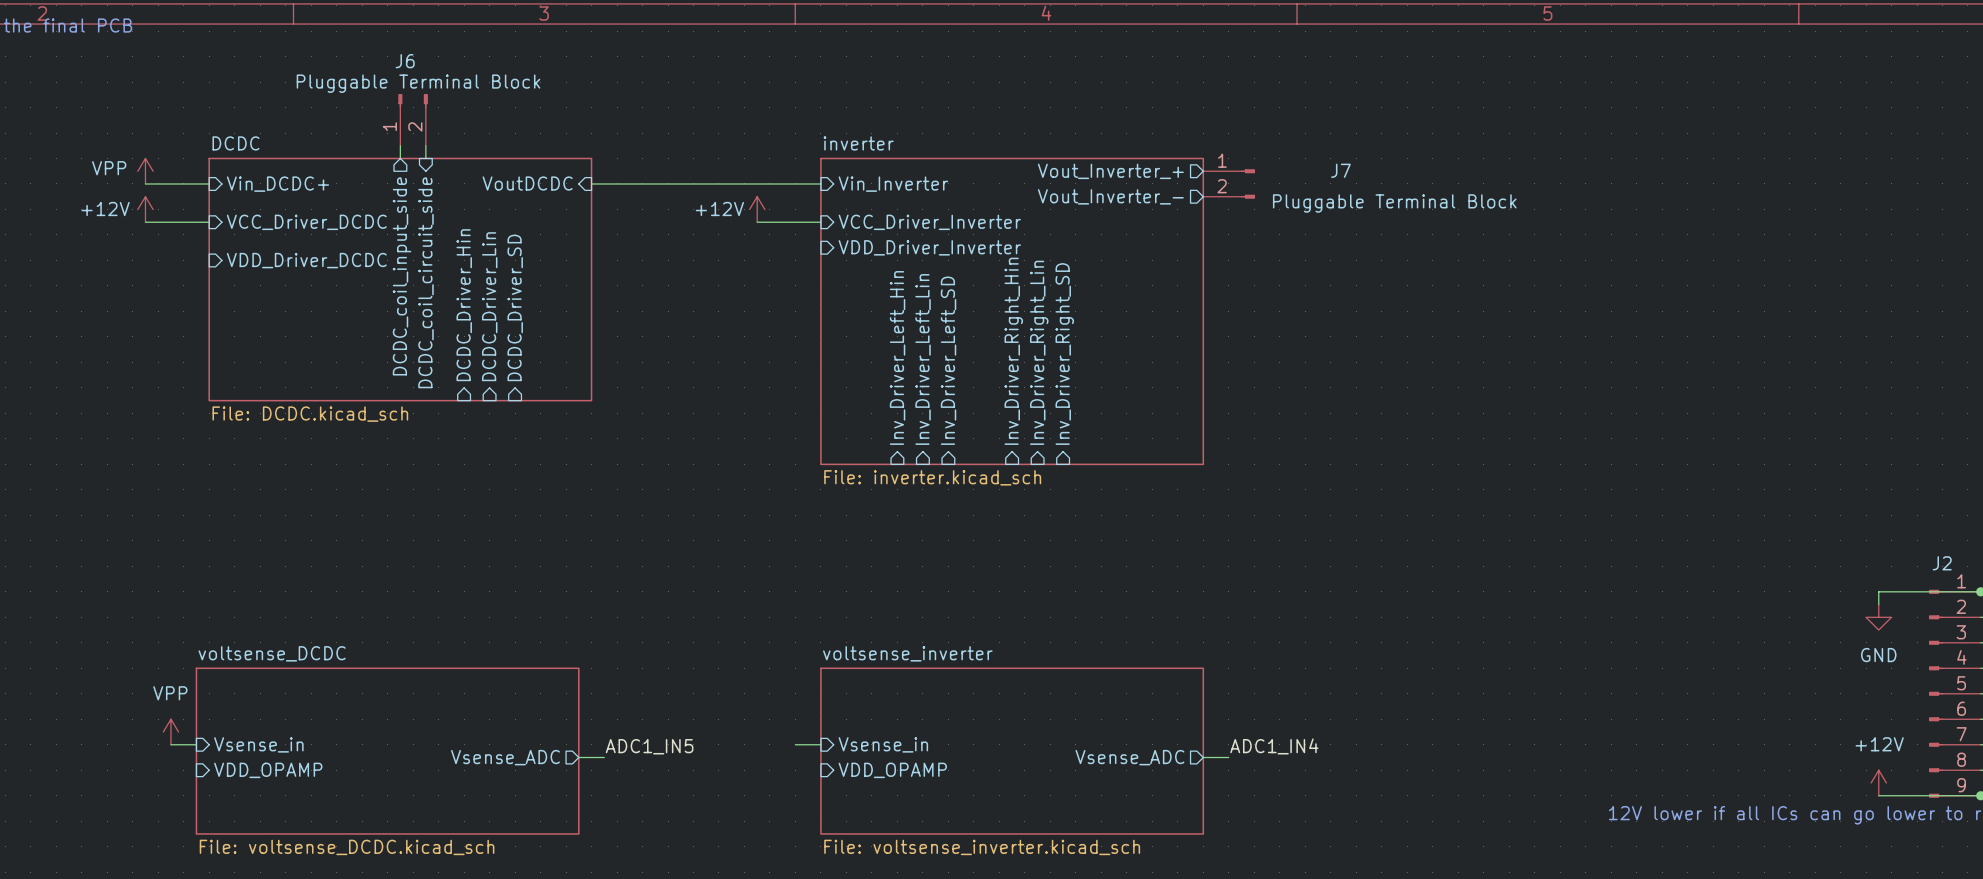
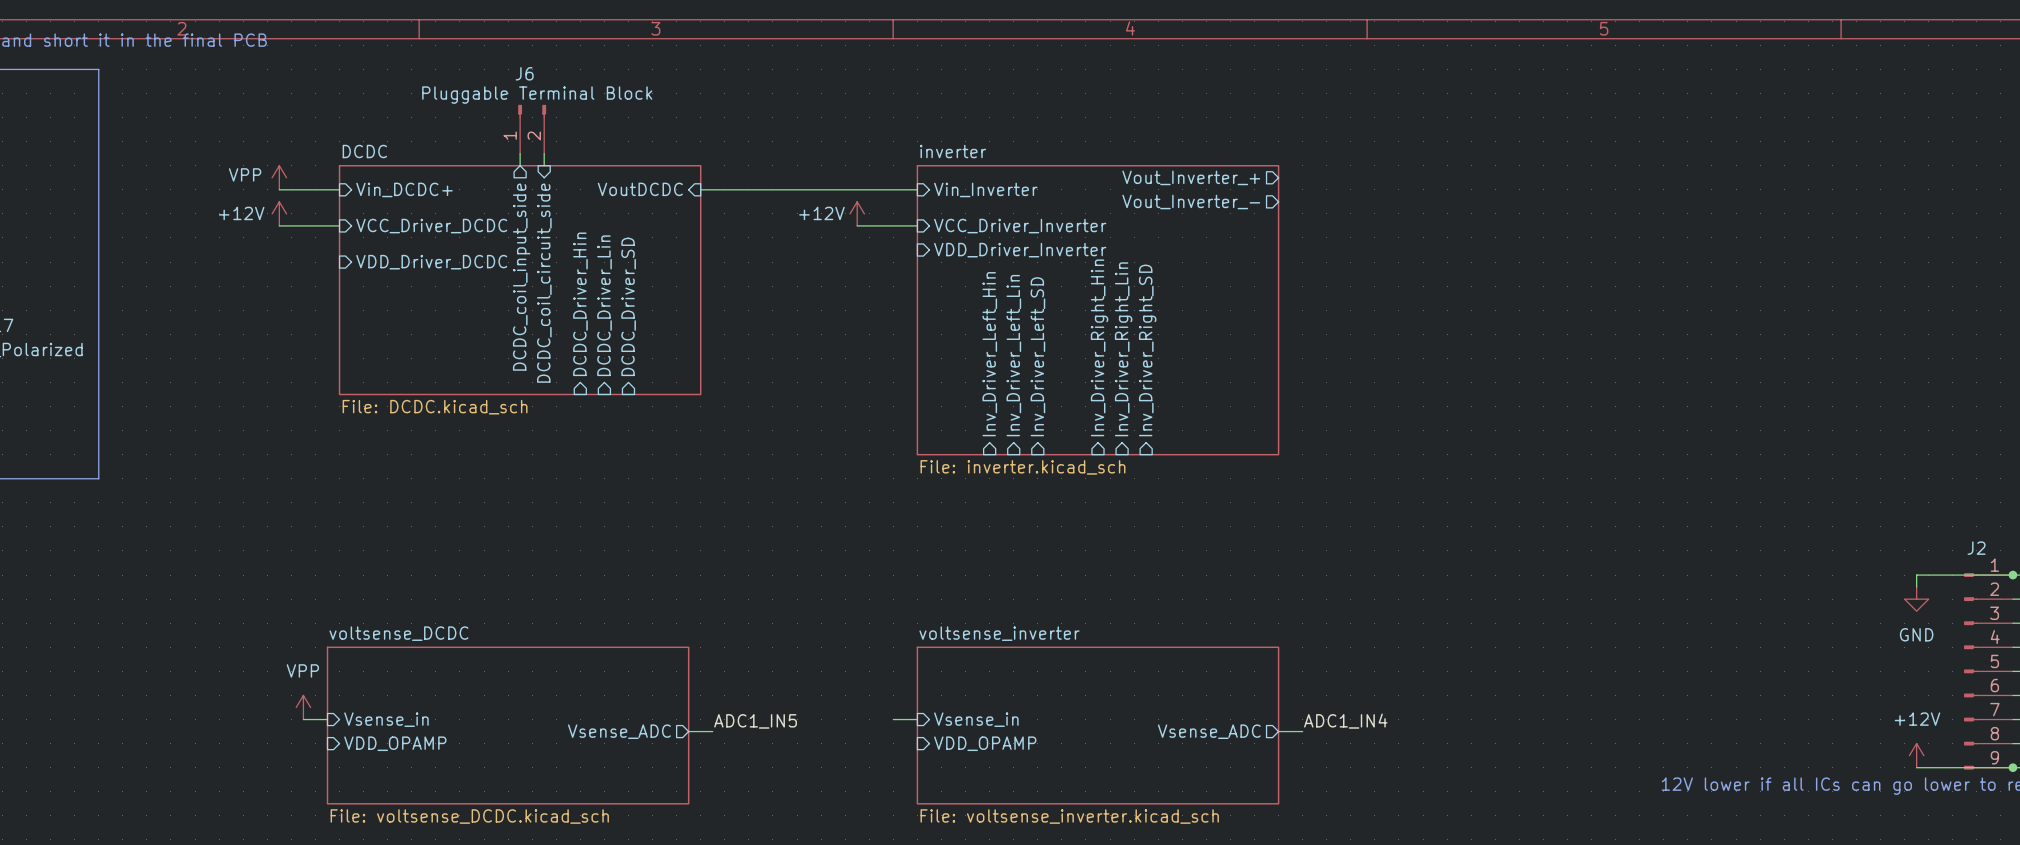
J7: Pluggable Terminal Block (1229, 183) -> none

